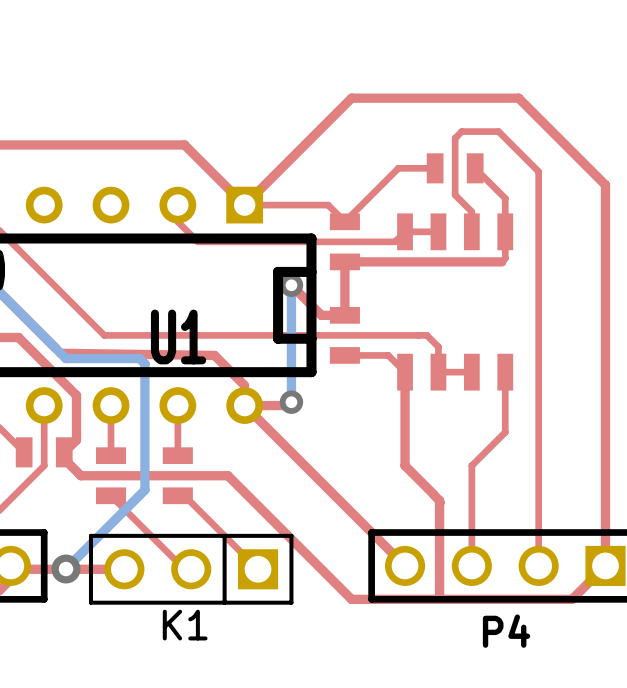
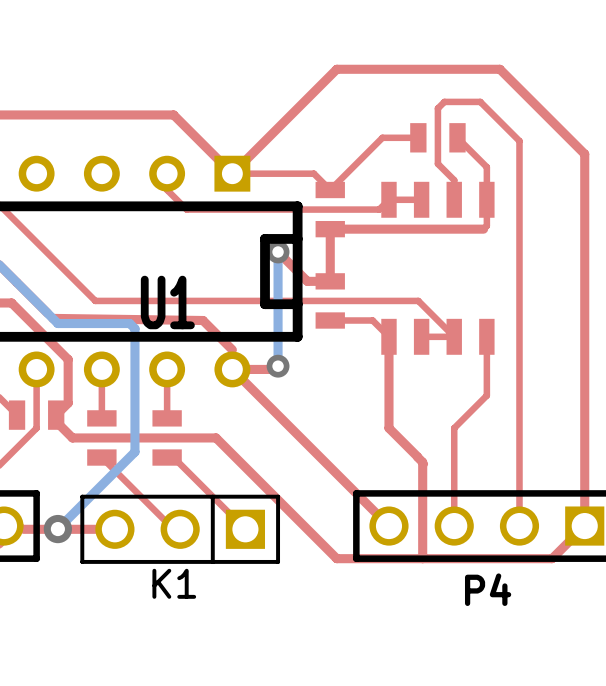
top track: (426, 335) (438, 346) (438, 372) -> (410, 300) (418, 300) (454, 336)

